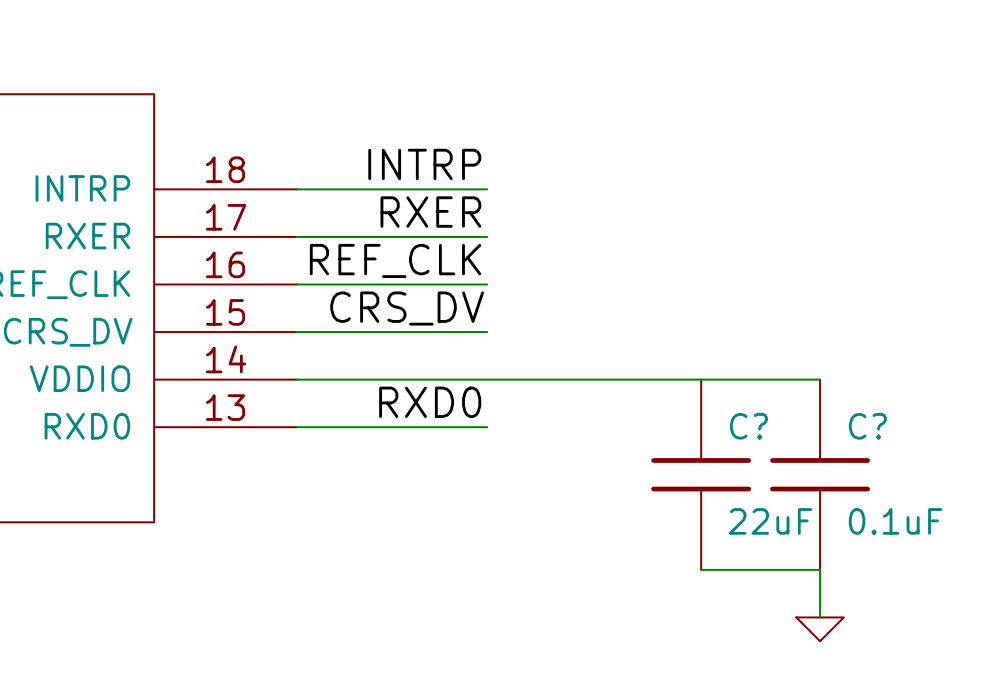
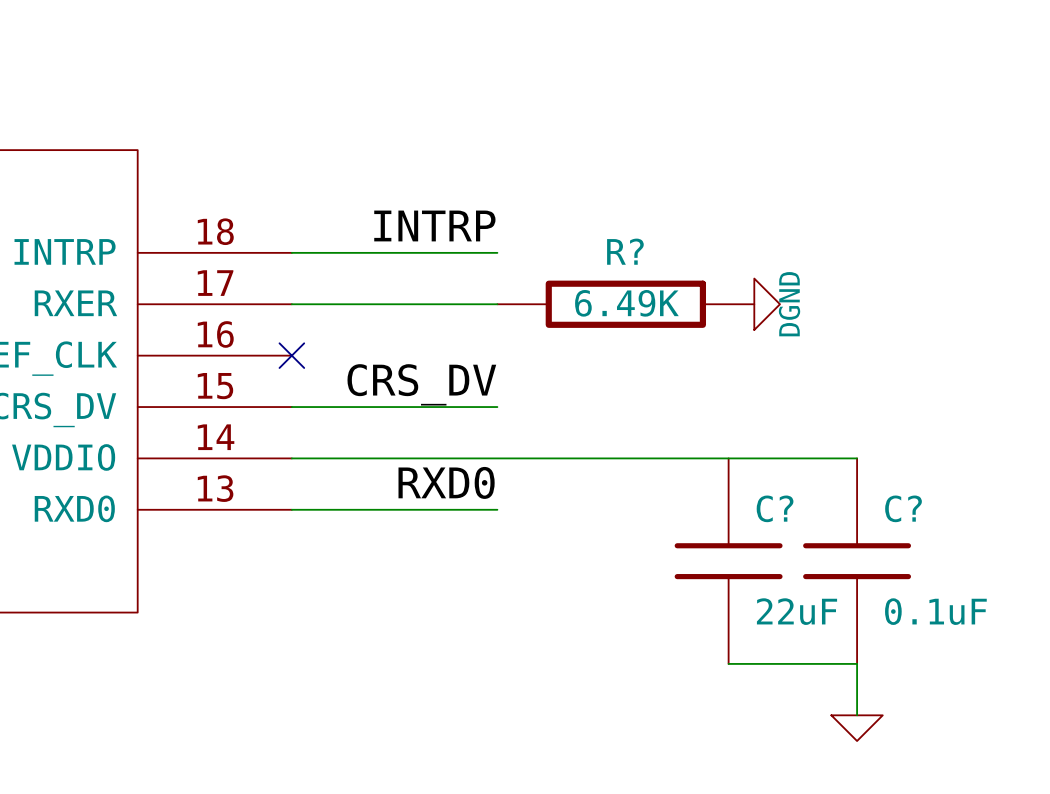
label: RXER (430, 212) -> none
R?: none -> 6.49K (625, 304)
power symbol: none -> DGND (767, 304)
label: REF_CLK (395, 260) -> none
wire: (296, 284) (487, 284) -> none
no-connect mark: none -> (291, 355)

